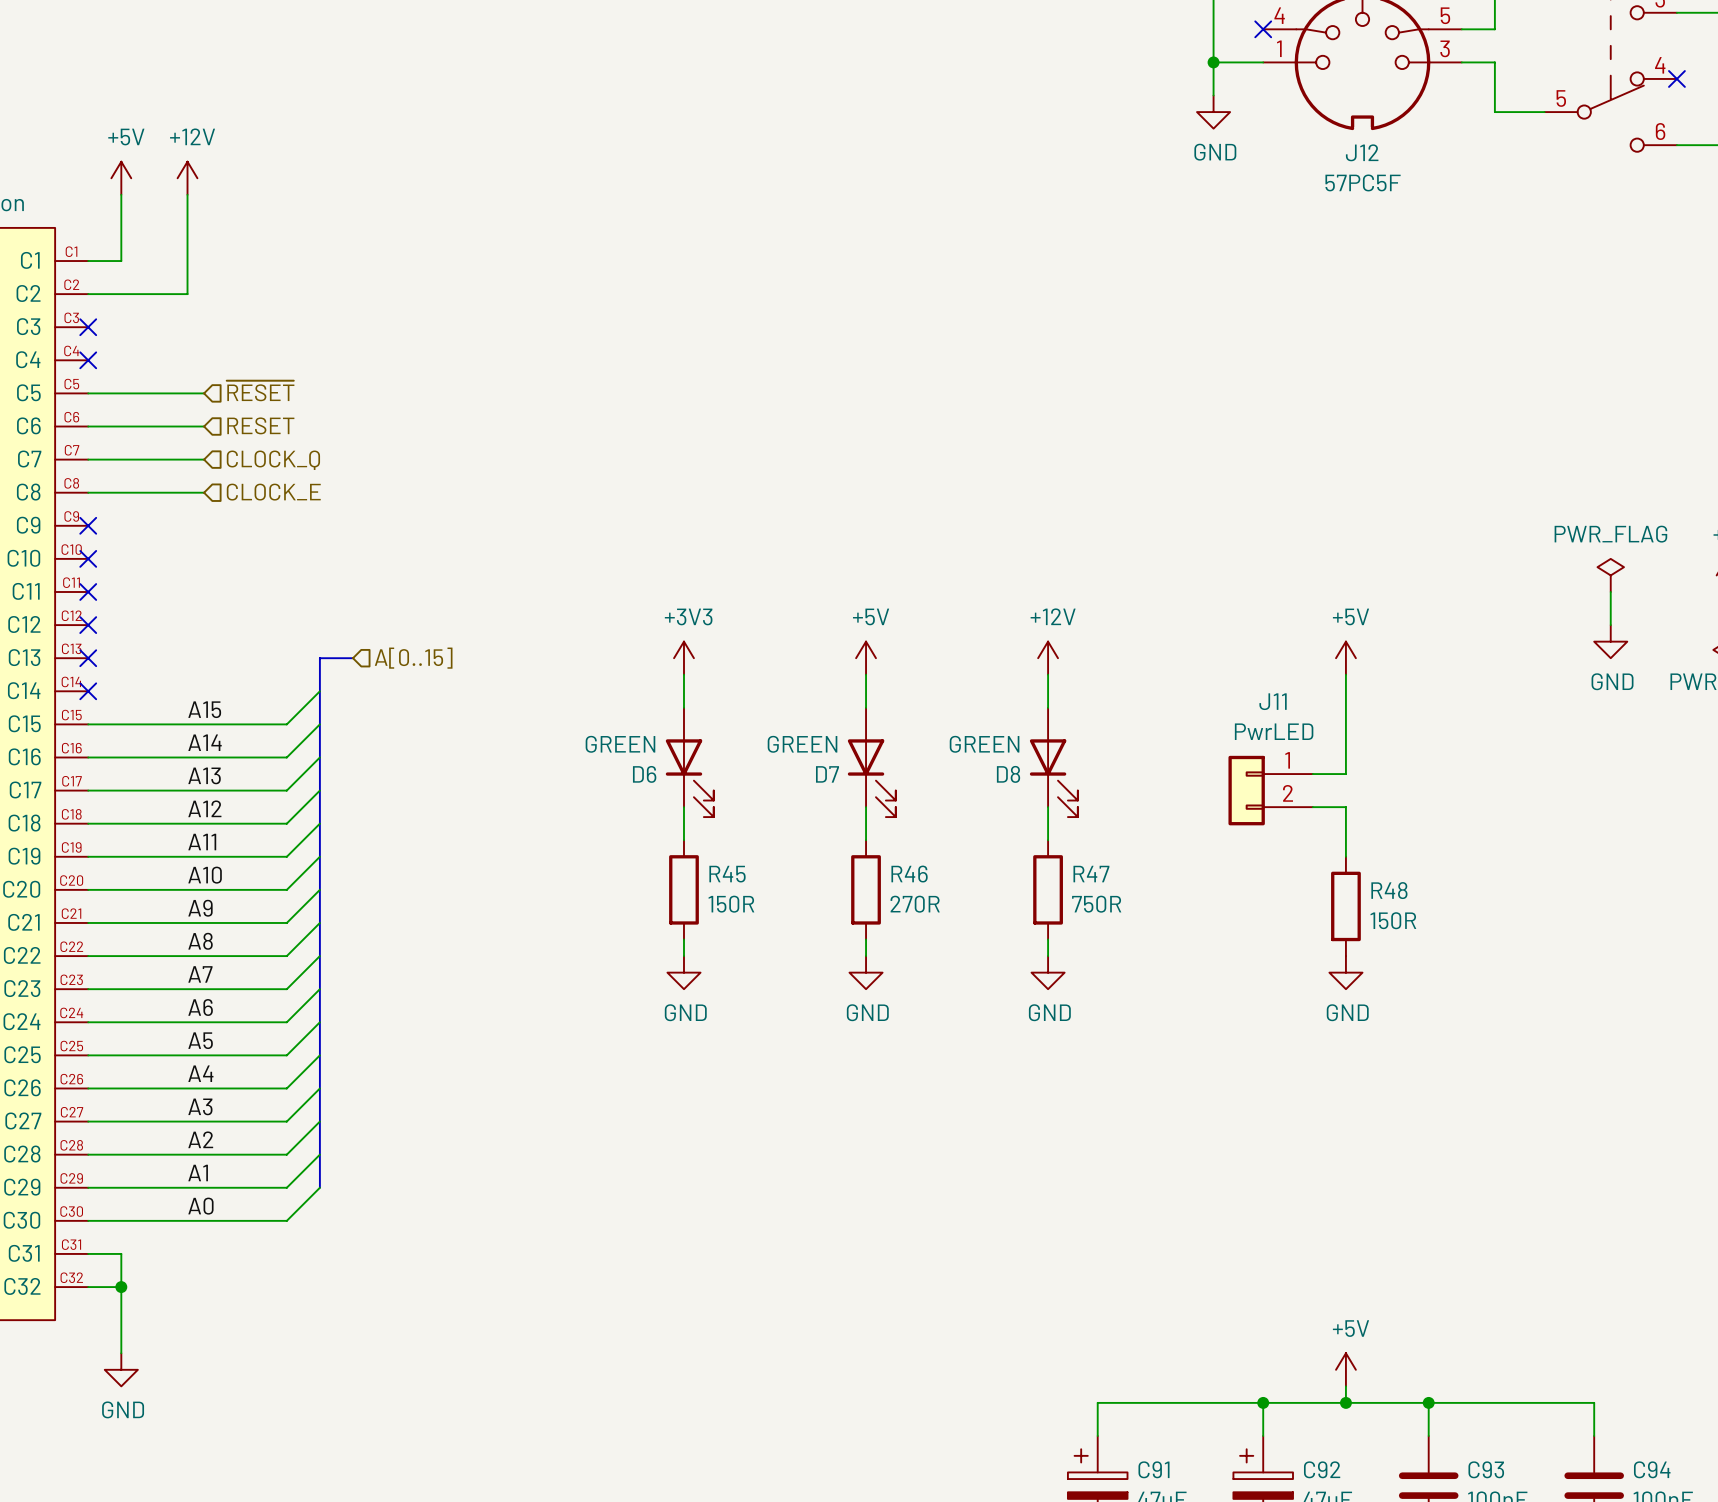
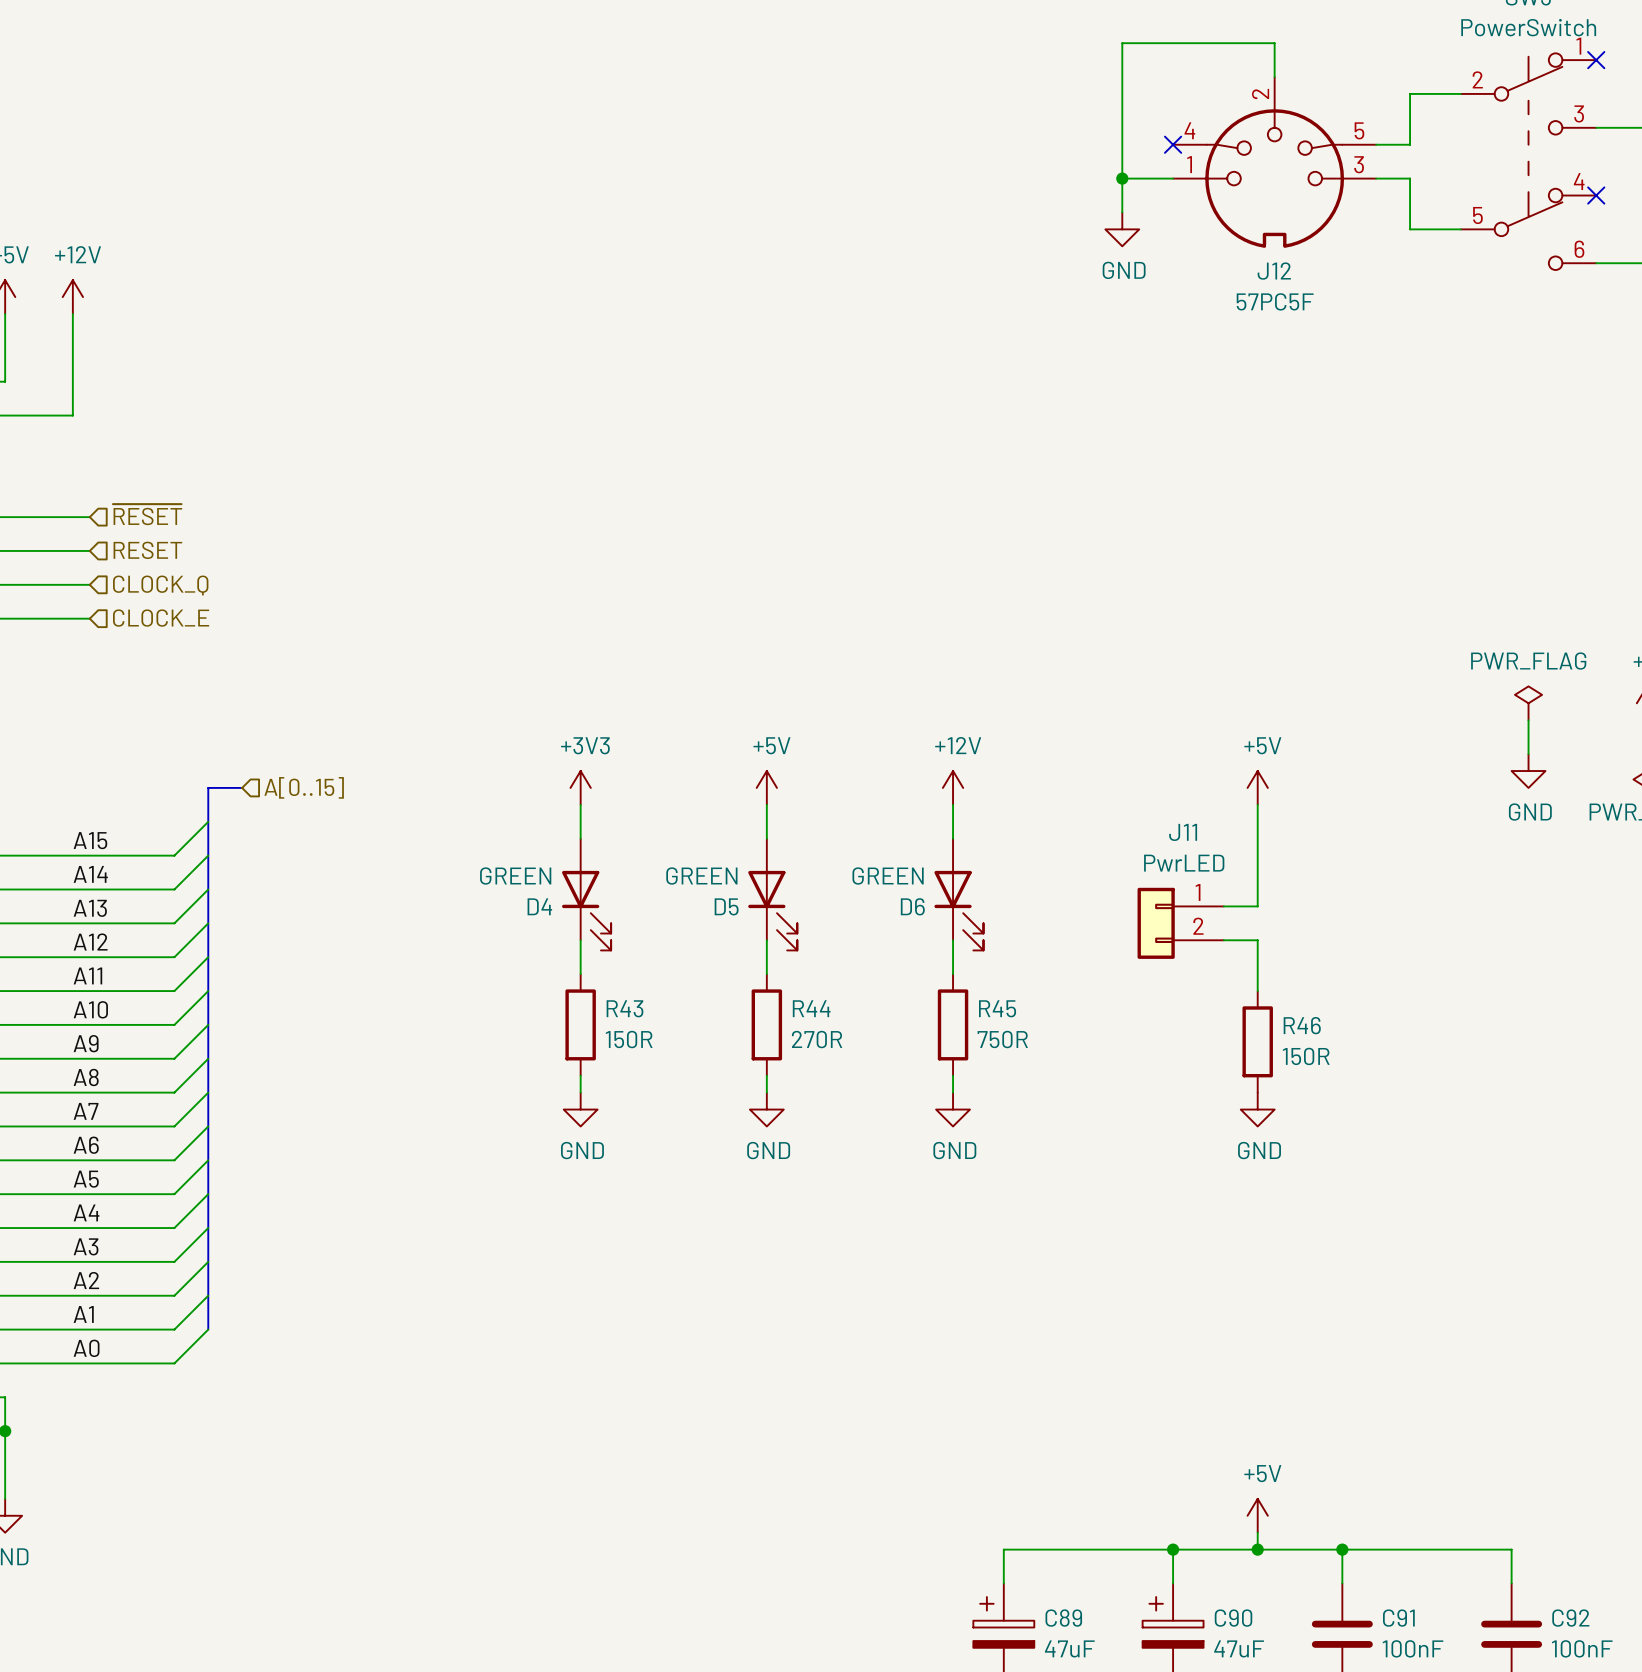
D6 name: D6 (644, 774) -> D4 (539, 906)
D7 name: D7 (827, 774) -> D5 (726, 906)
D8 name: D8 (1008, 774) -> D6 (912, 906)
R45 name: R45 (727, 874) -> R43 (624, 1008)
R46 name: R46 (909, 874) -> R44 (811, 1008)
R47 name: R47 (1091, 874) -> R45 (997, 1008)
R48 name: R48 (1389, 890) -> R46 (1302, 1025)
C91 name: C91 (1154, 1469) -> C89 (1063, 1618)
C92 name: C92 (1322, 1469) -> C90 (1233, 1618)
C93 name: C93 (1486, 1469) -> C91 (1398, 1618)
C94 name: C94 (1652, 1469) -> C92 (1570, 1618)

